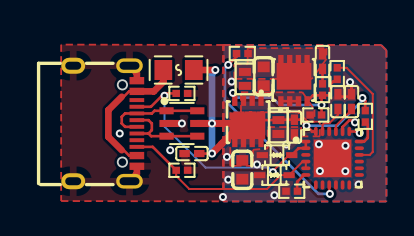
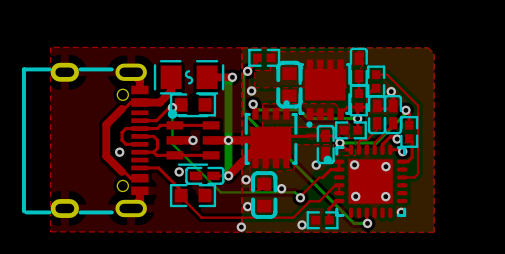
part: (244, 77) -> none
part footprint: [168, 85, 196, 102] -> [169, 93, 217, 117]
part: (278, 125) -> none
part: (277, 155) -> none
part footprint: [168, 162, 196, 178] -> [169, 183, 217, 208]
part: (274, 175) -> none

